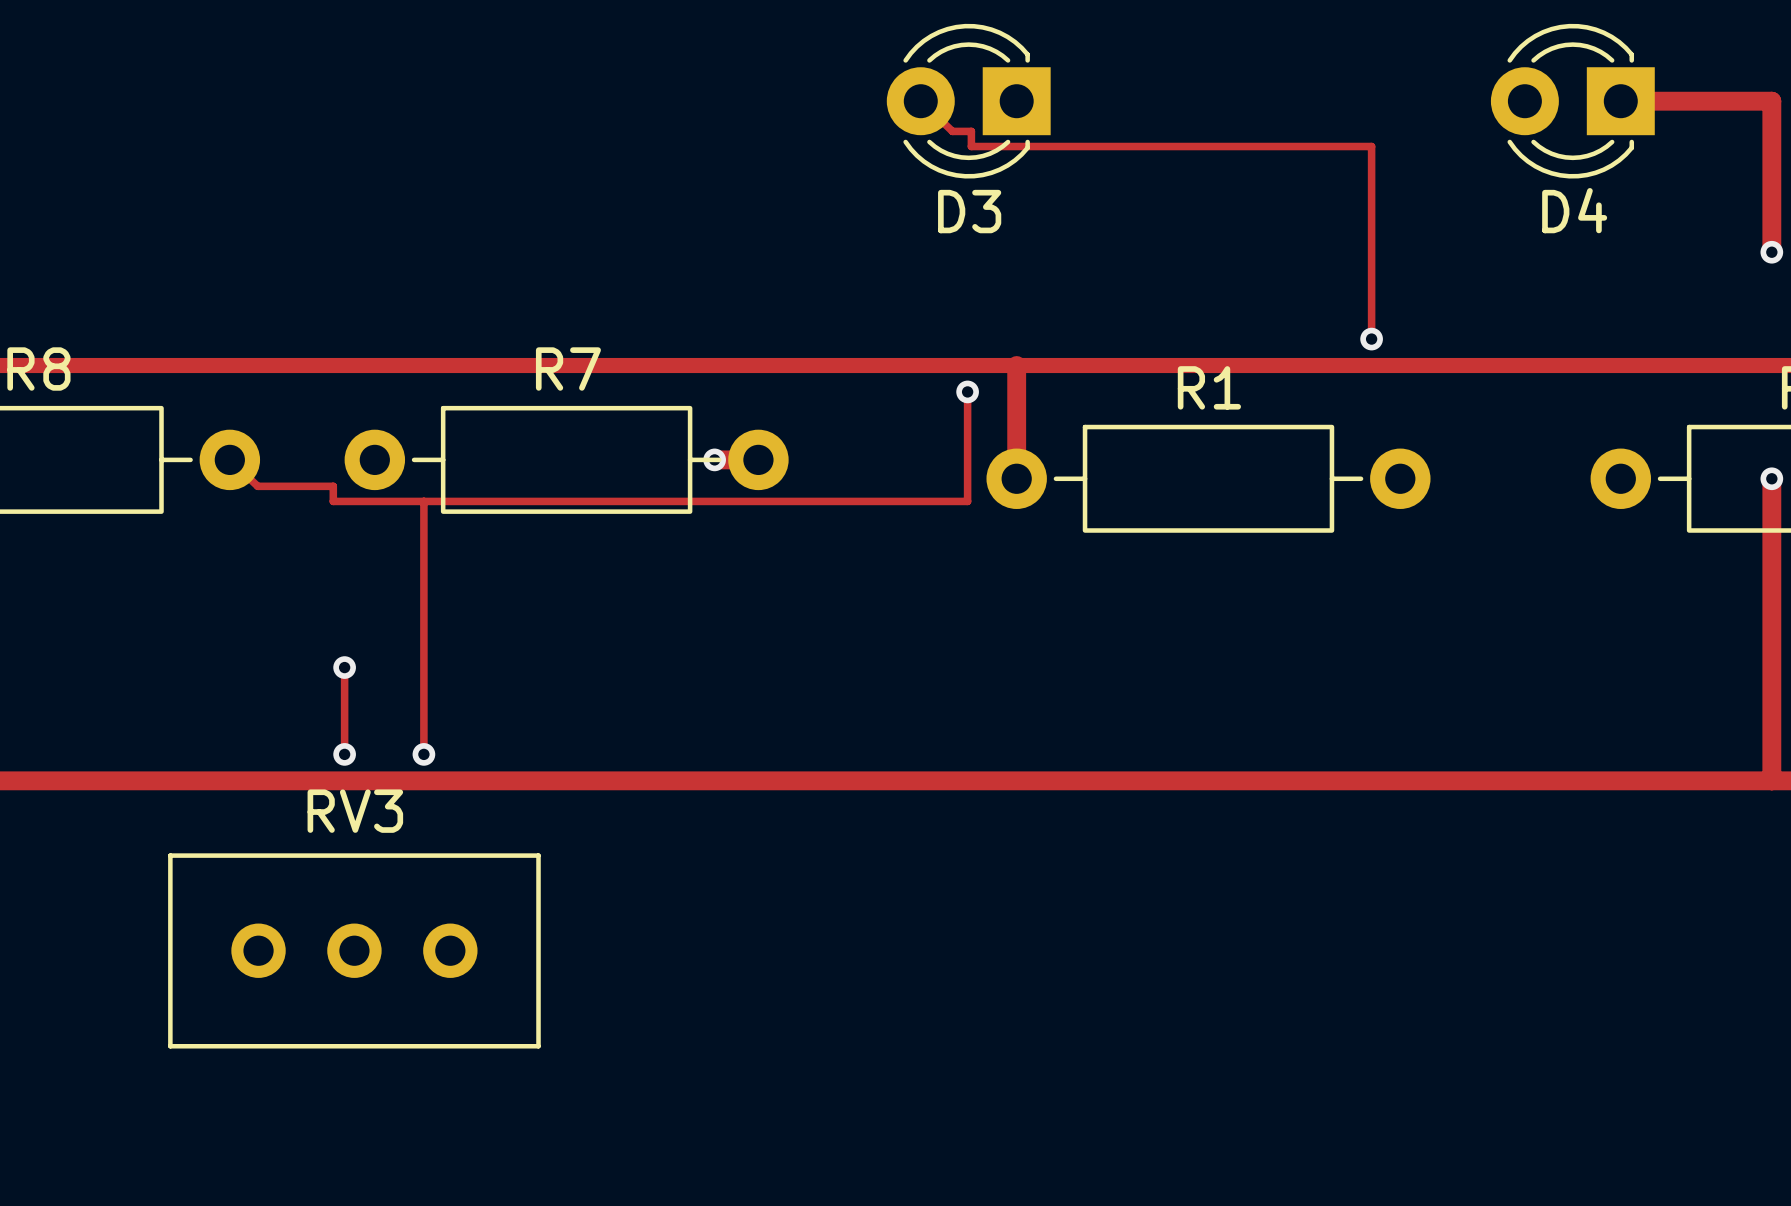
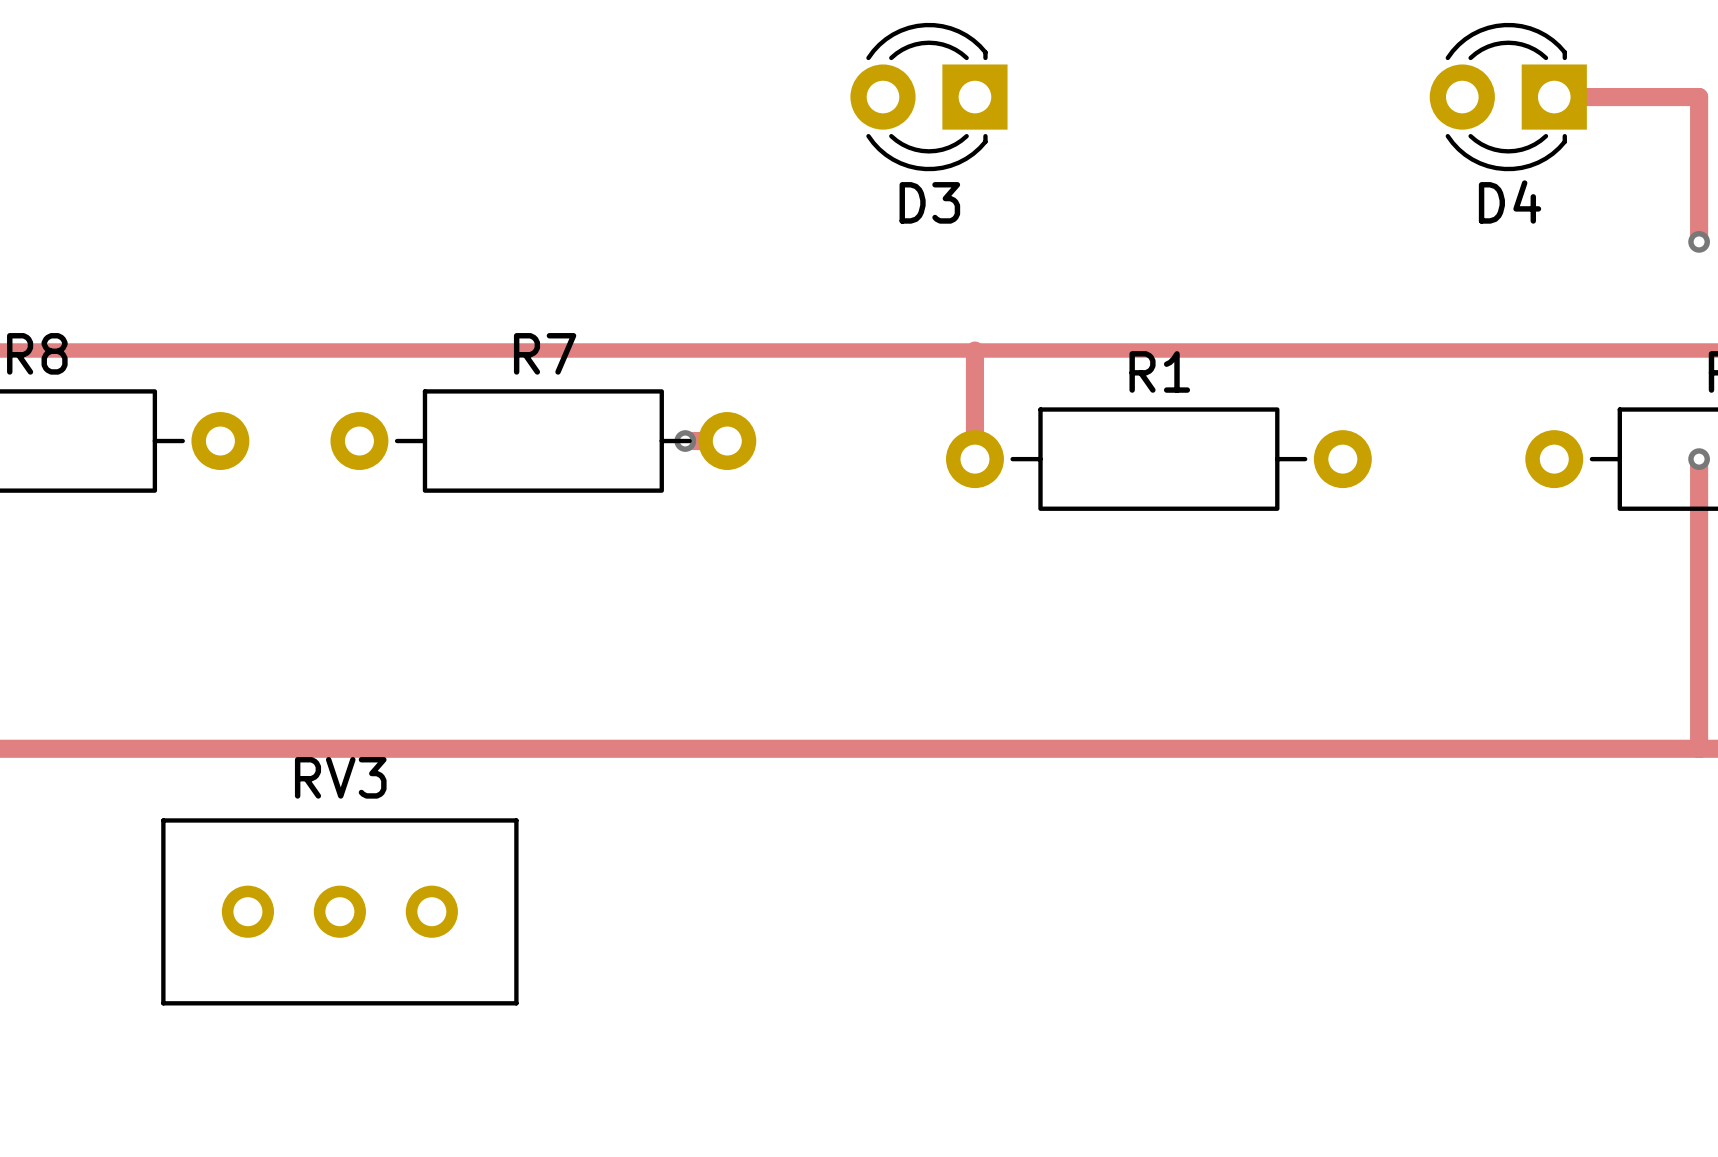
track: (920, 101) (952, 131) (971, 131) (971, 146) (1371, 146) (1371, 339) -> none
via: (1371, 339) -> none
track: (967, 391) (967, 501) (333, 501) (333, 486) (257, 486) (229, 459) -> none
via: (967, 391) -> none
track: (423, 501) (423, 754) -> none
track: (344, 667) (344, 754) -> none
via: (344, 667) -> none
via: (344, 754) -> none
via: (423, 754) -> none

